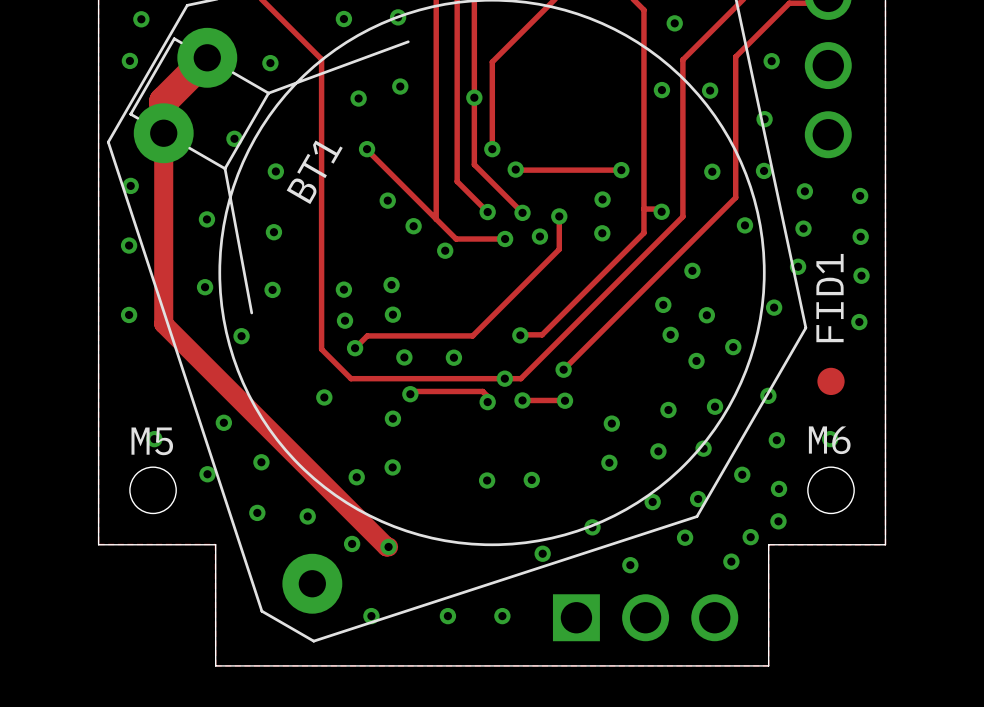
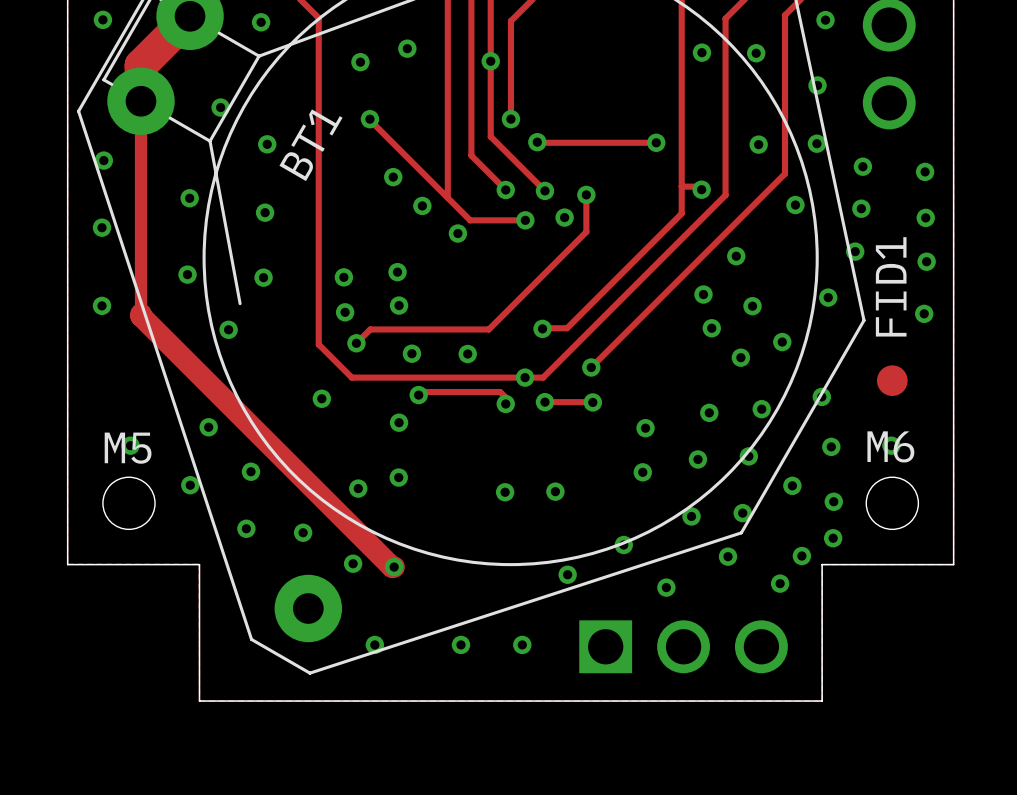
track width: thick (163, 133) (163, 322) -> thin (140, 101) (140, 313)
via: (602, 199) -> none
via: (602, 233) -> none

